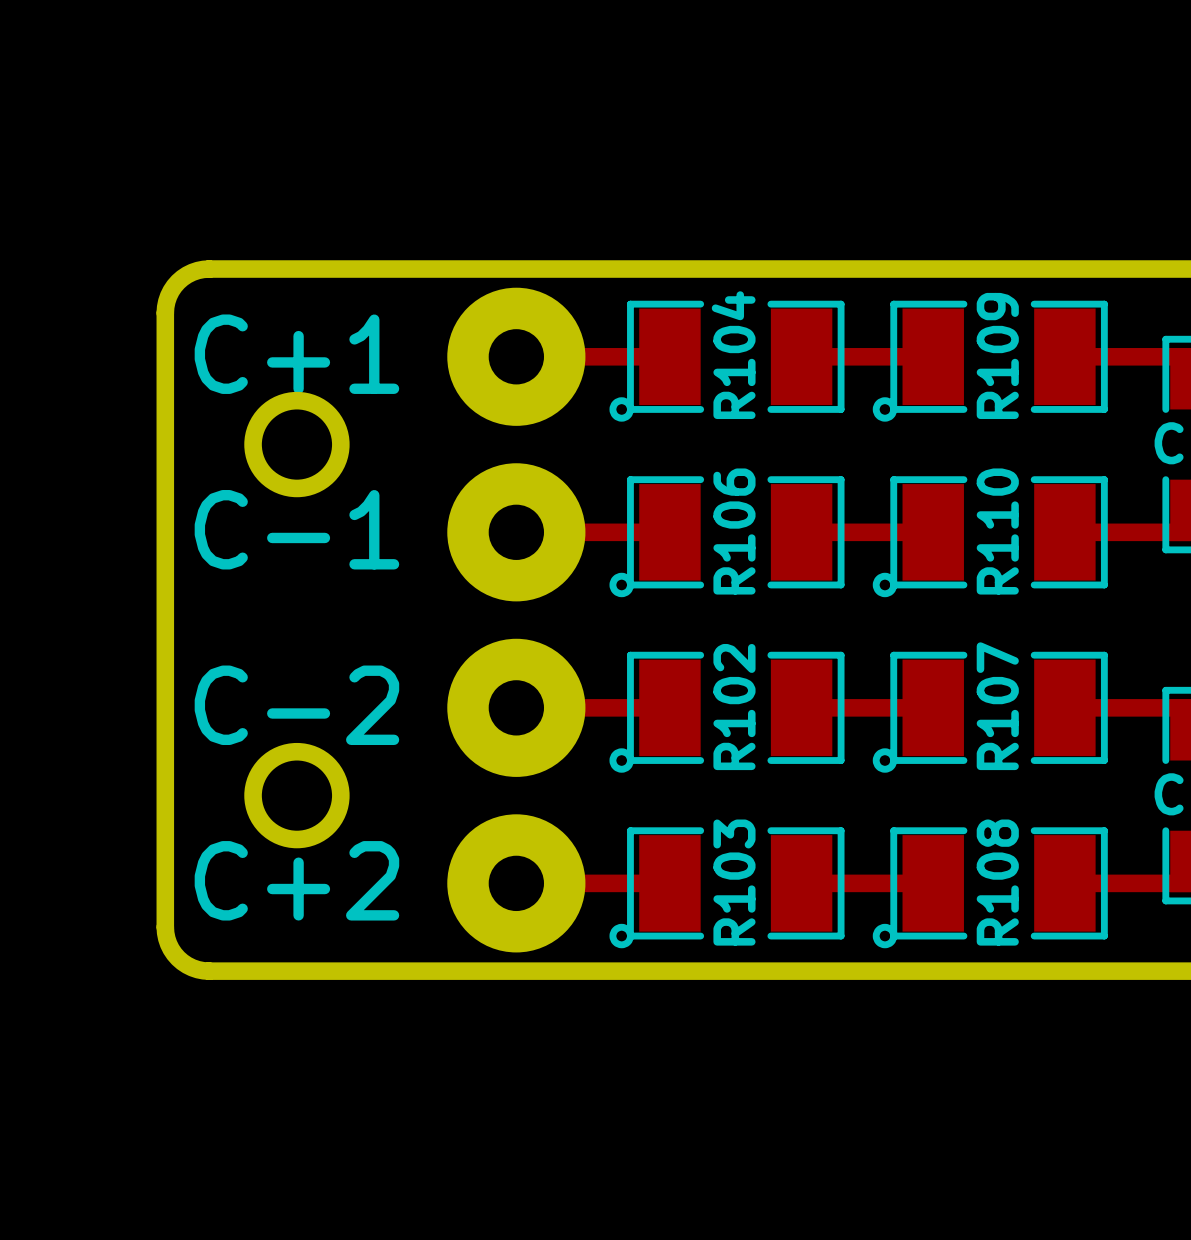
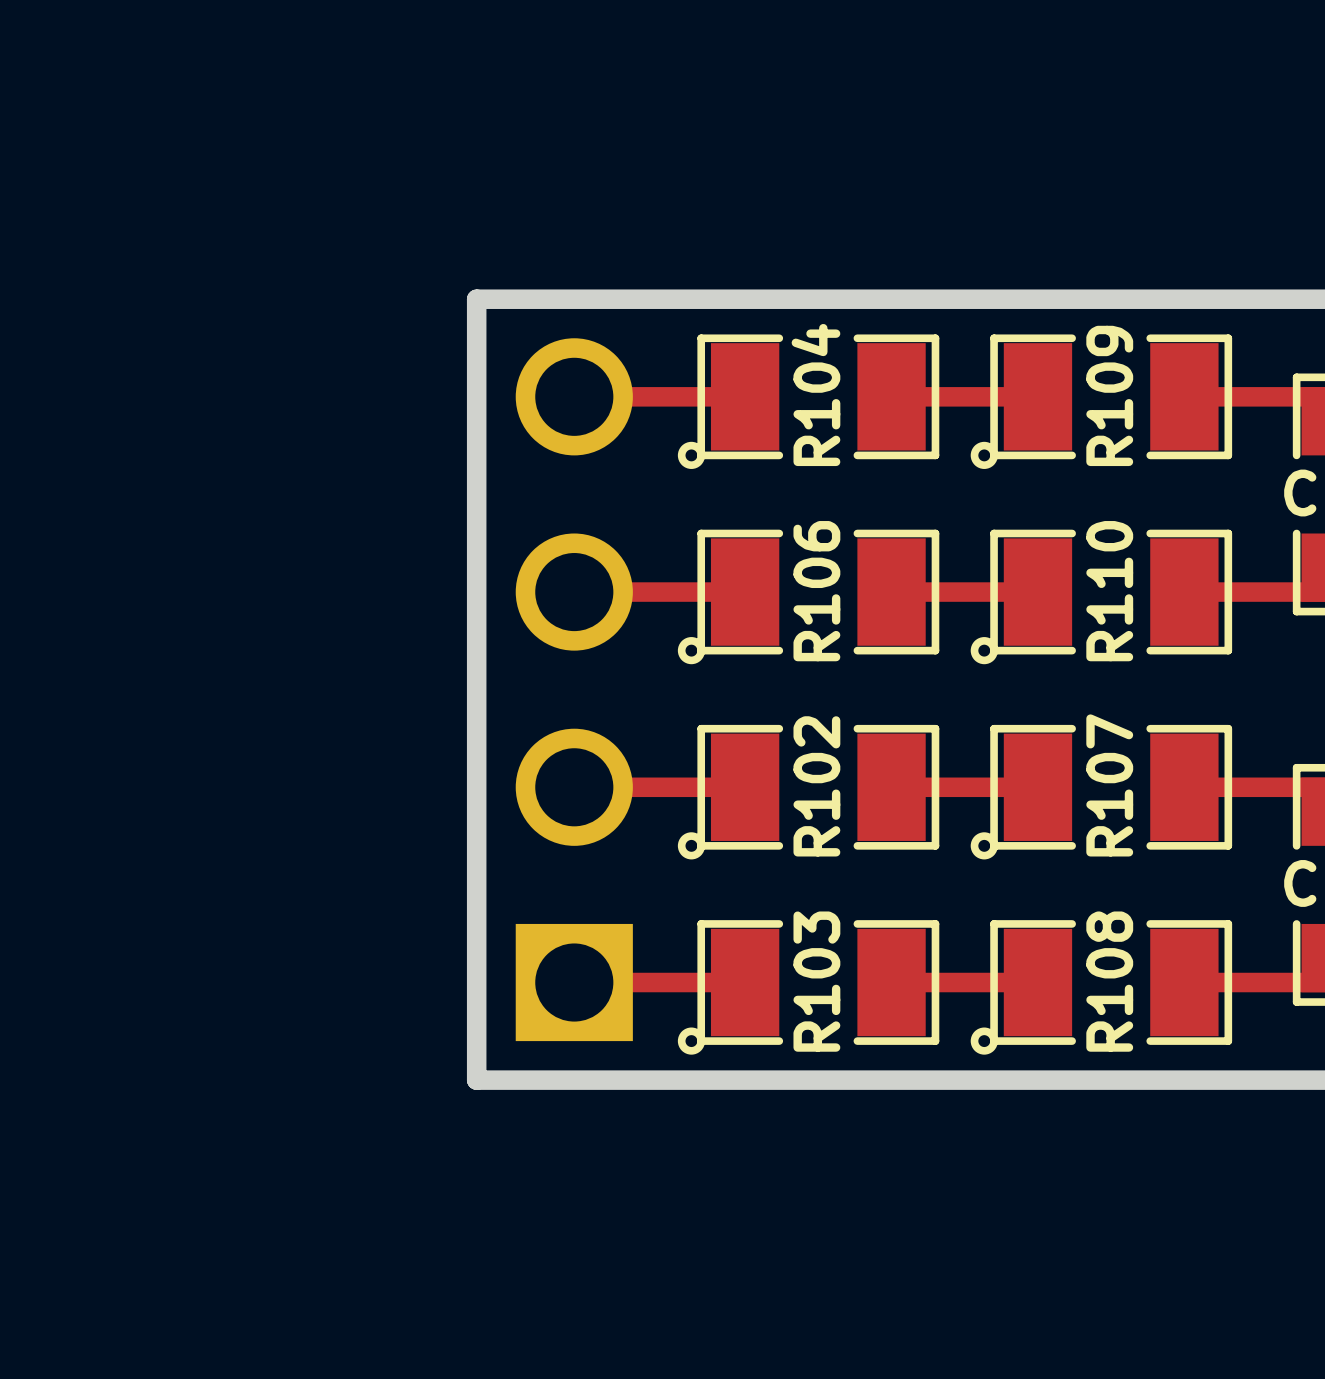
board edge: (428, 269) (203, 269) (187, 274) (174, 286) (166, 301) (165, 312) (165, 927) (168, 944) (182, 962) (203, 970) (428, 971) -> (476, 299) (476, 1080)
text: C+1 (296, 354) -> none
part: (516, 356) -> none
round board edge: [244, 391, 350, 498] -> none
text: C-1 (296, 529) -> none
part: (516, 532) -> none
part: none -> (574, 689)
text: C-2 (296, 705) -> none
part: (516, 707) -> none
round board edge: [244, 742, 350, 849] -> none
text: C+2 (296, 880) -> none
part: (516, 883) -> none

